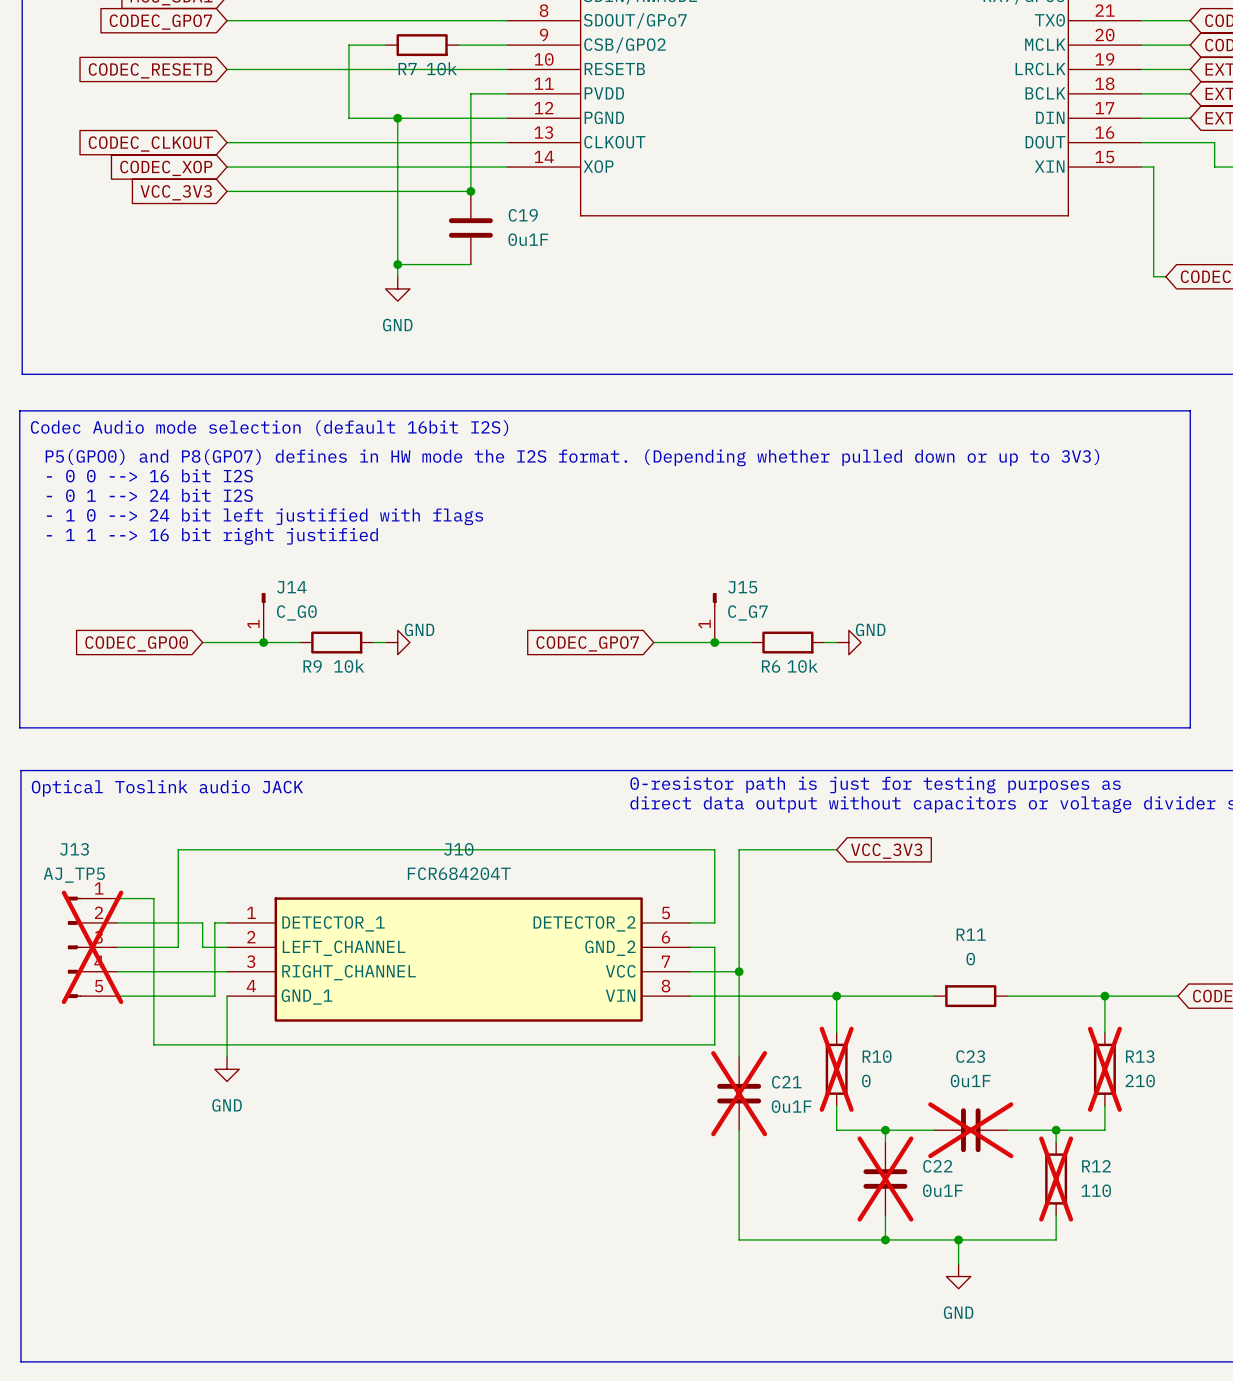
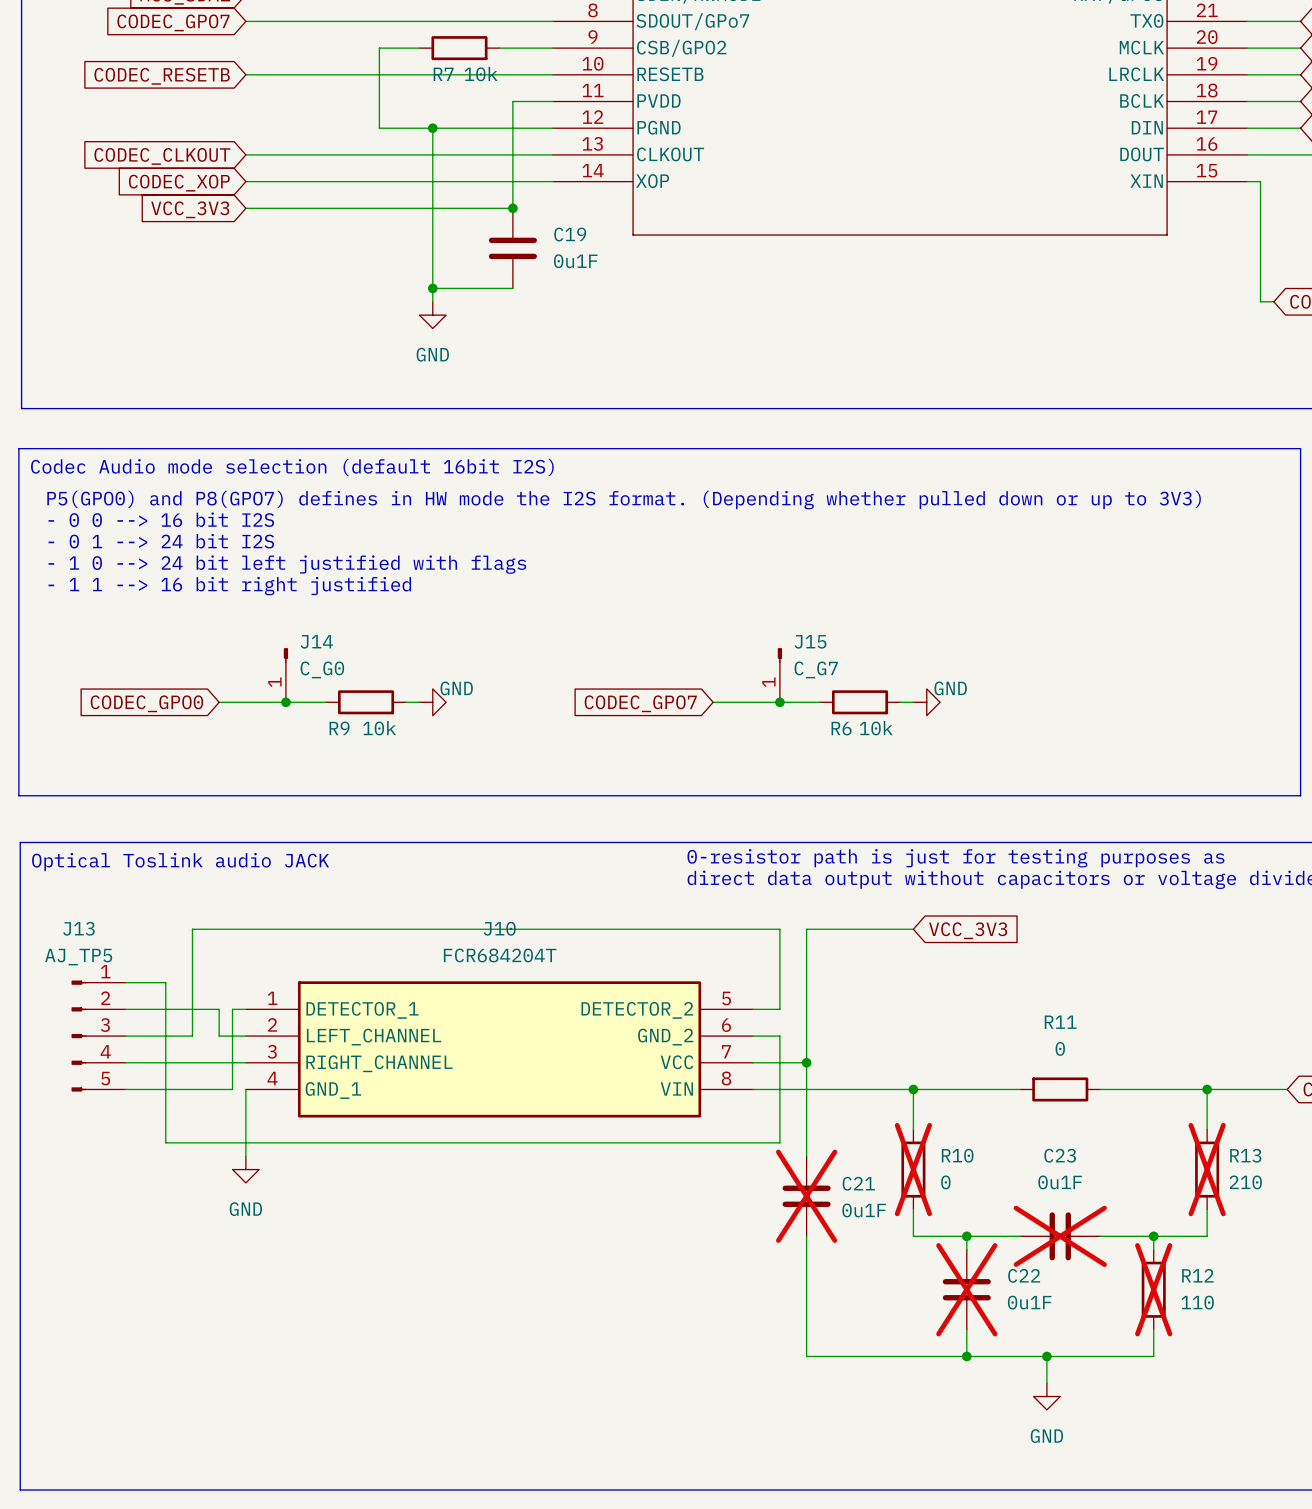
J13 do-not-place cross: (92, 947) -> none

